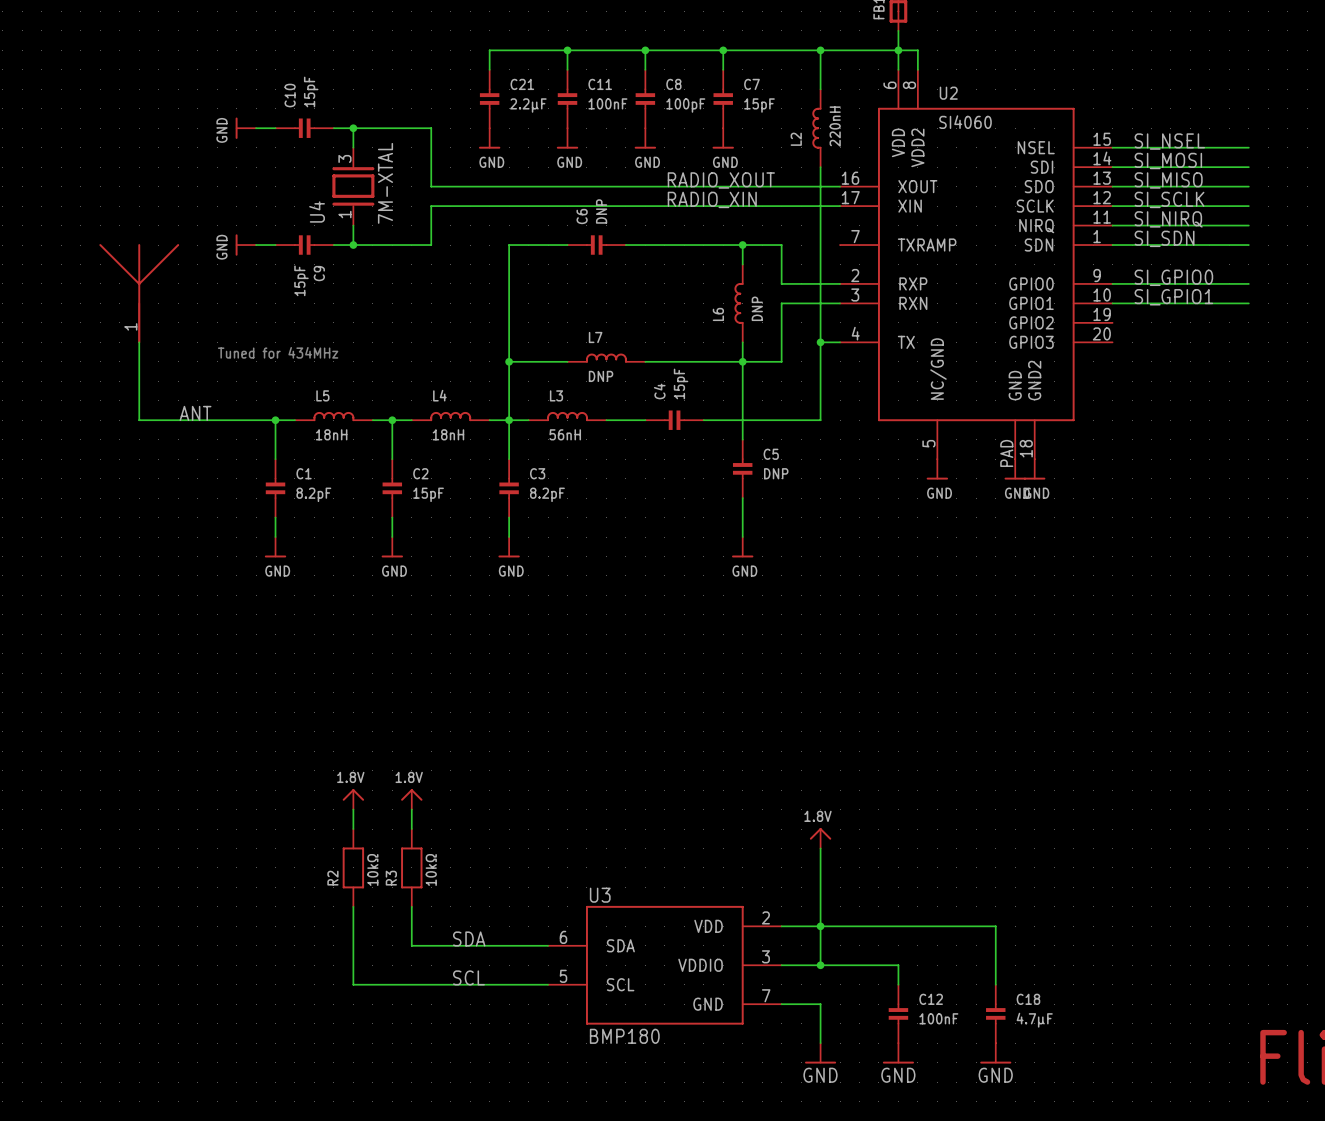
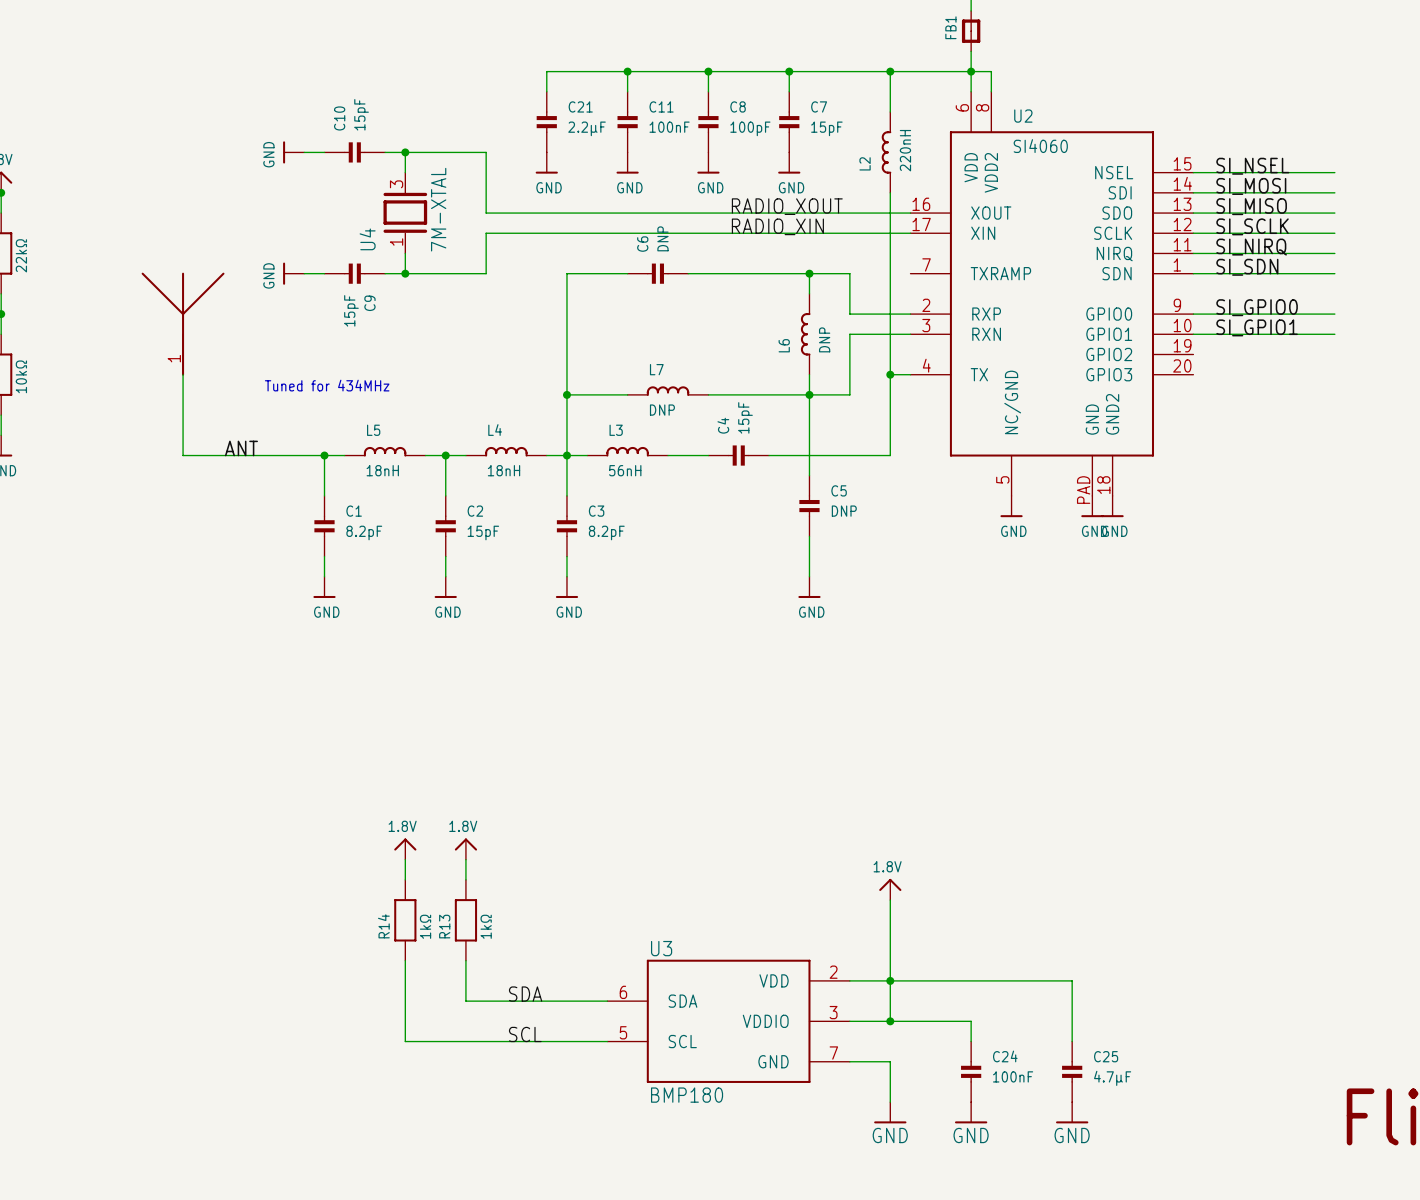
R2 value: 10kΩ (372, 869) -> 1kΩ (425, 926)
R3 value: 10kΩ (431, 869) -> 1kΩ (486, 926)
R2 name: R2 (332, 878) -> R14 (383, 926)
R3 name: R3 (391, 878) -> R13 (444, 926)
C12 name: C12 (931, 999) -> C24 (1005, 1056)
C18 name: C18 (1028, 999) -> C25 (1106, 1056)

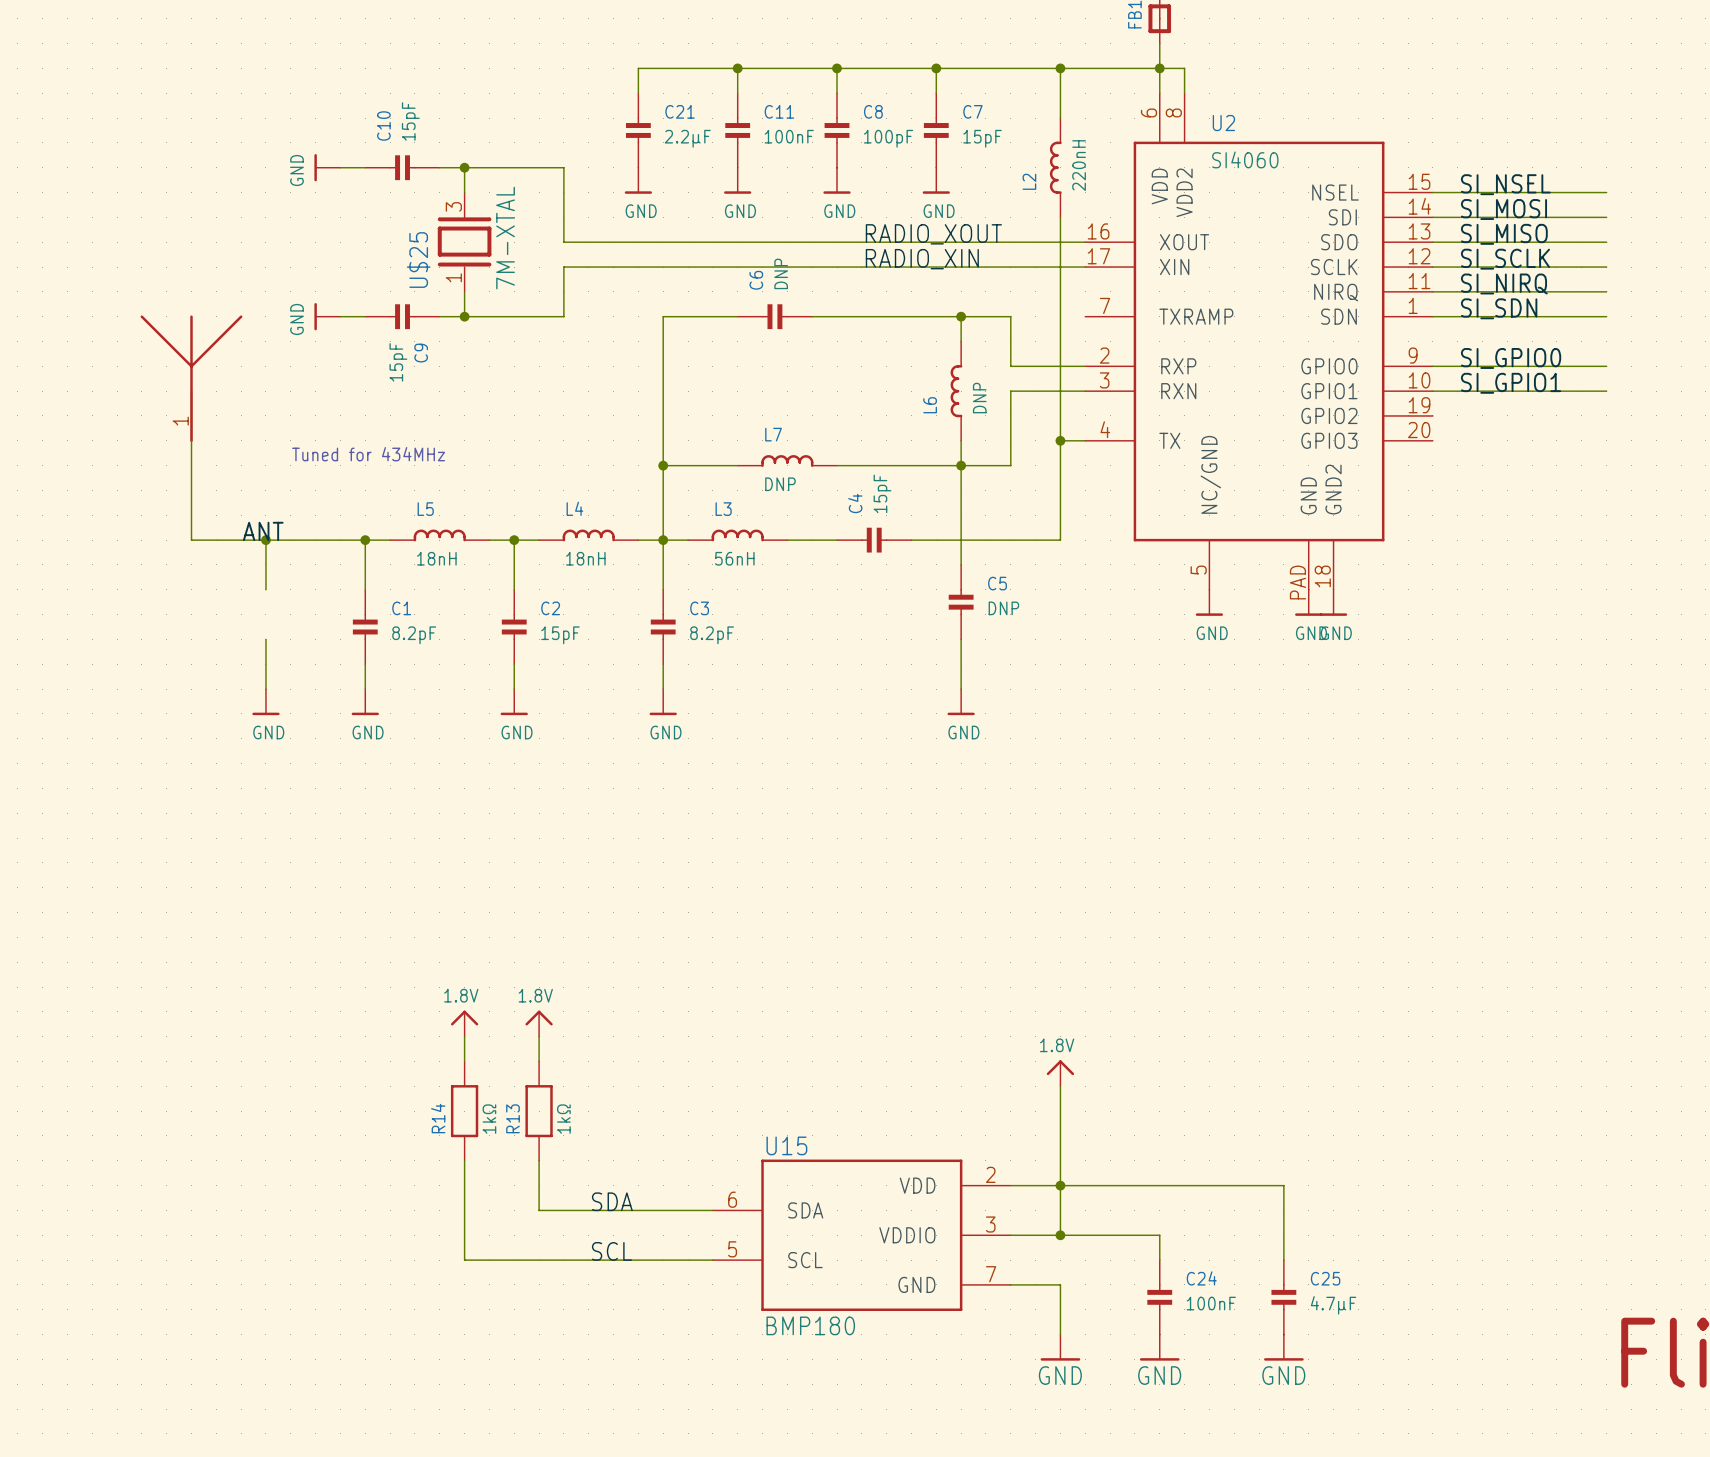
U4 name: U4 (367, 239) -> U$25 (418, 260)
wire: none -> (265, 540) (265, 589)
junction: none -> (265, 540)
wire: none -> (265, 639) (265, 689)
power symbol: none -> GND (265, 702)
U3 name: U3 (661, 948) -> U15 (786, 1145)

